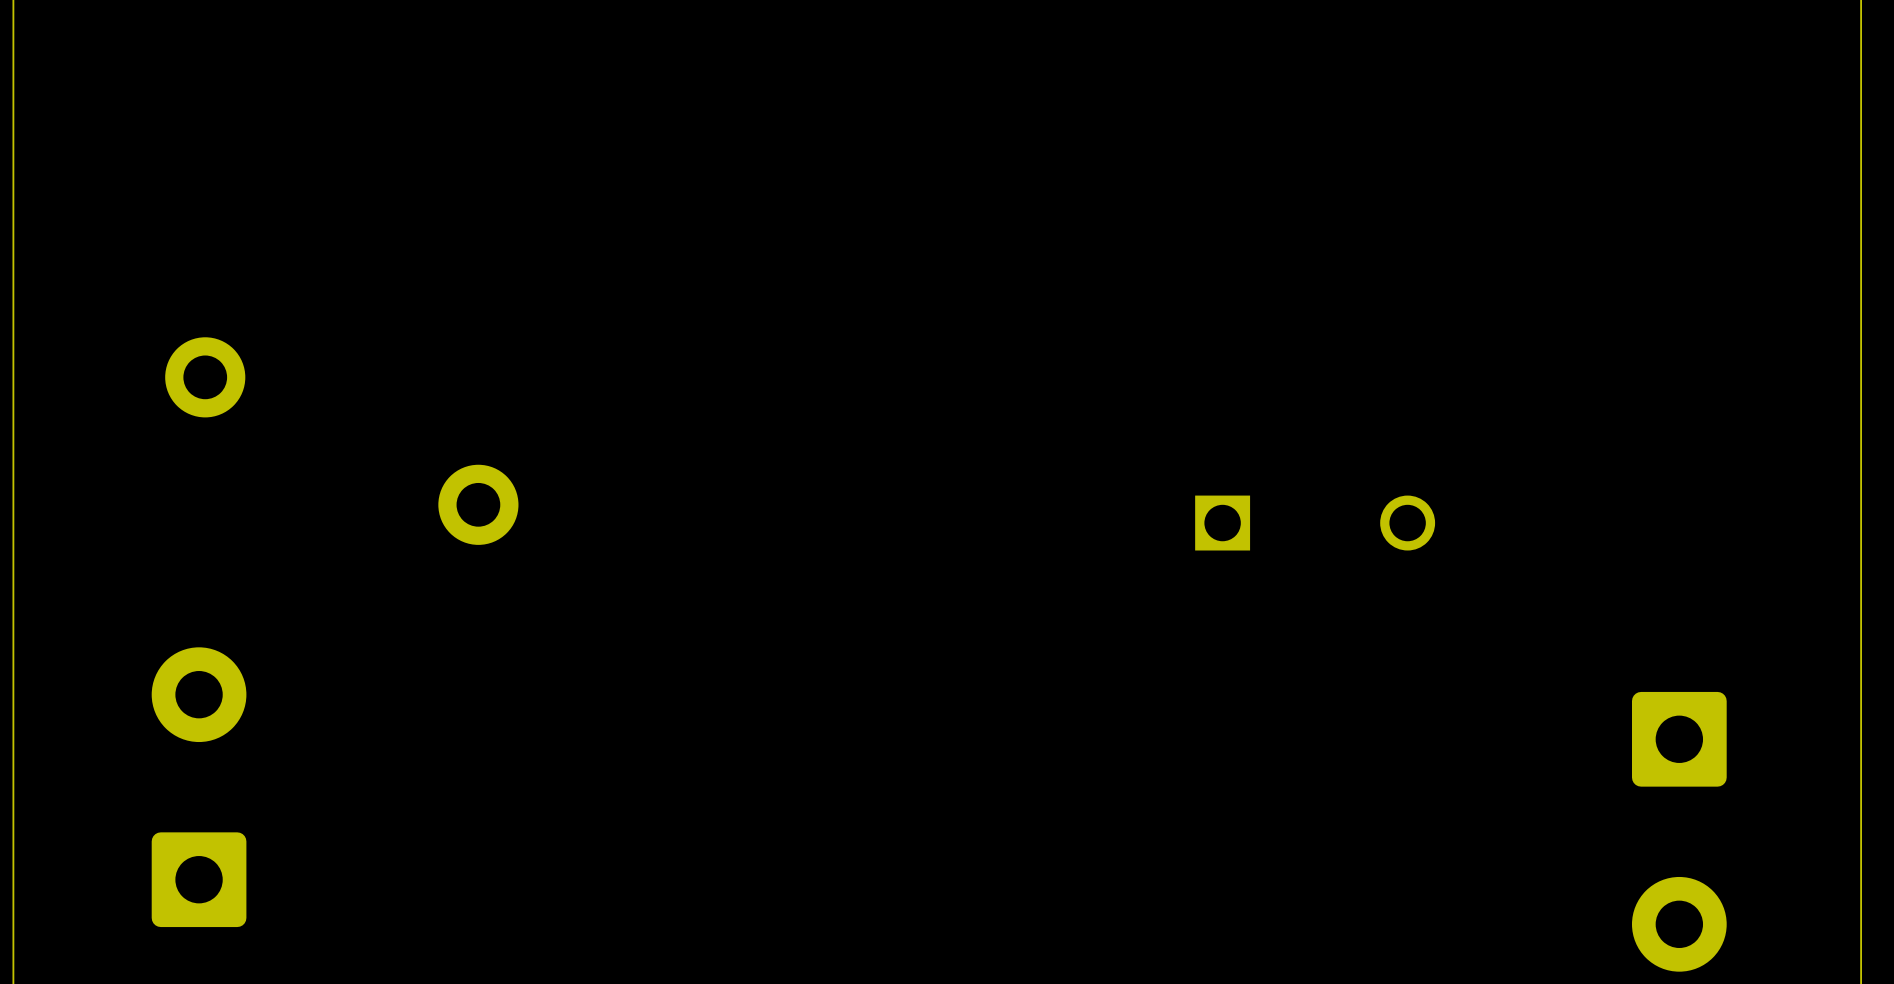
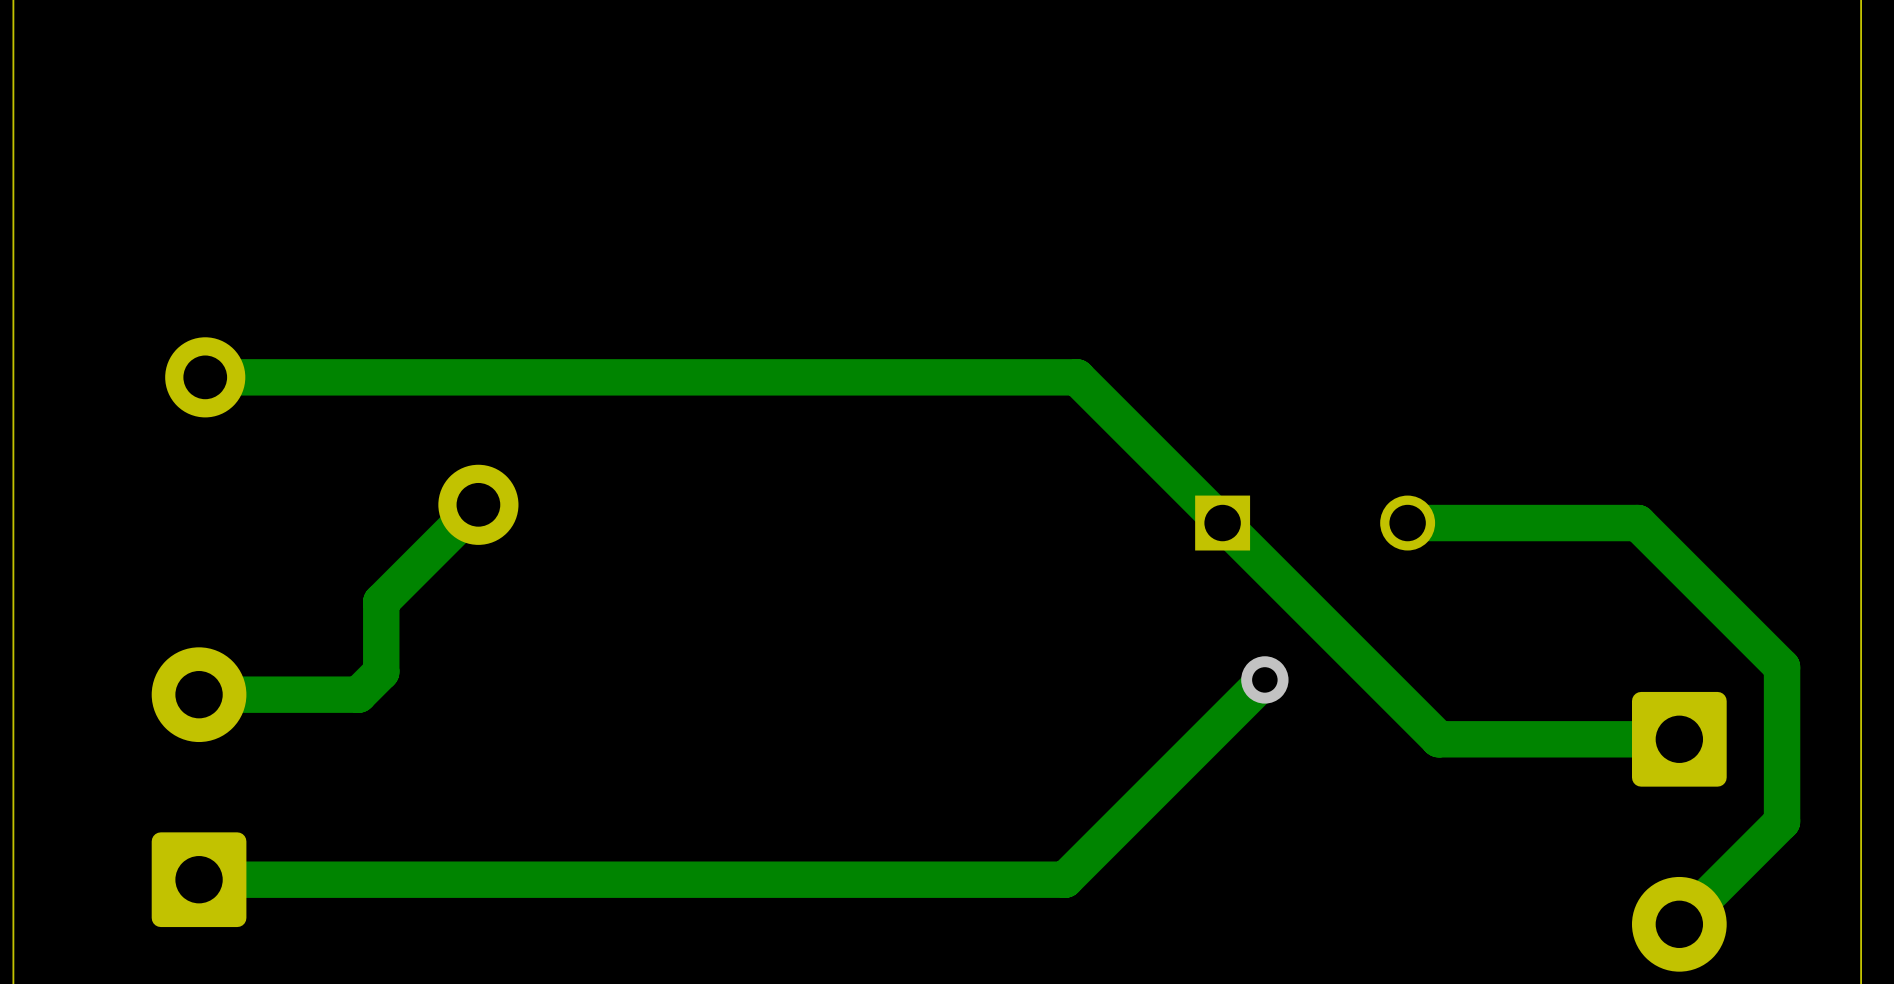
track: none -> (205, 377) (1076, 377) (1438, 739) (1679, 739)
track: none -> (478, 504) (381, 601) (381, 671) (358, 694) (199, 694)
track: none -> (1407, 523) (1637, 523) (1782, 667) (1782, 821) (1679, 924)
track: none -> (1264, 679) (1065, 879) (199, 879)
via: none -> (1264, 679)

